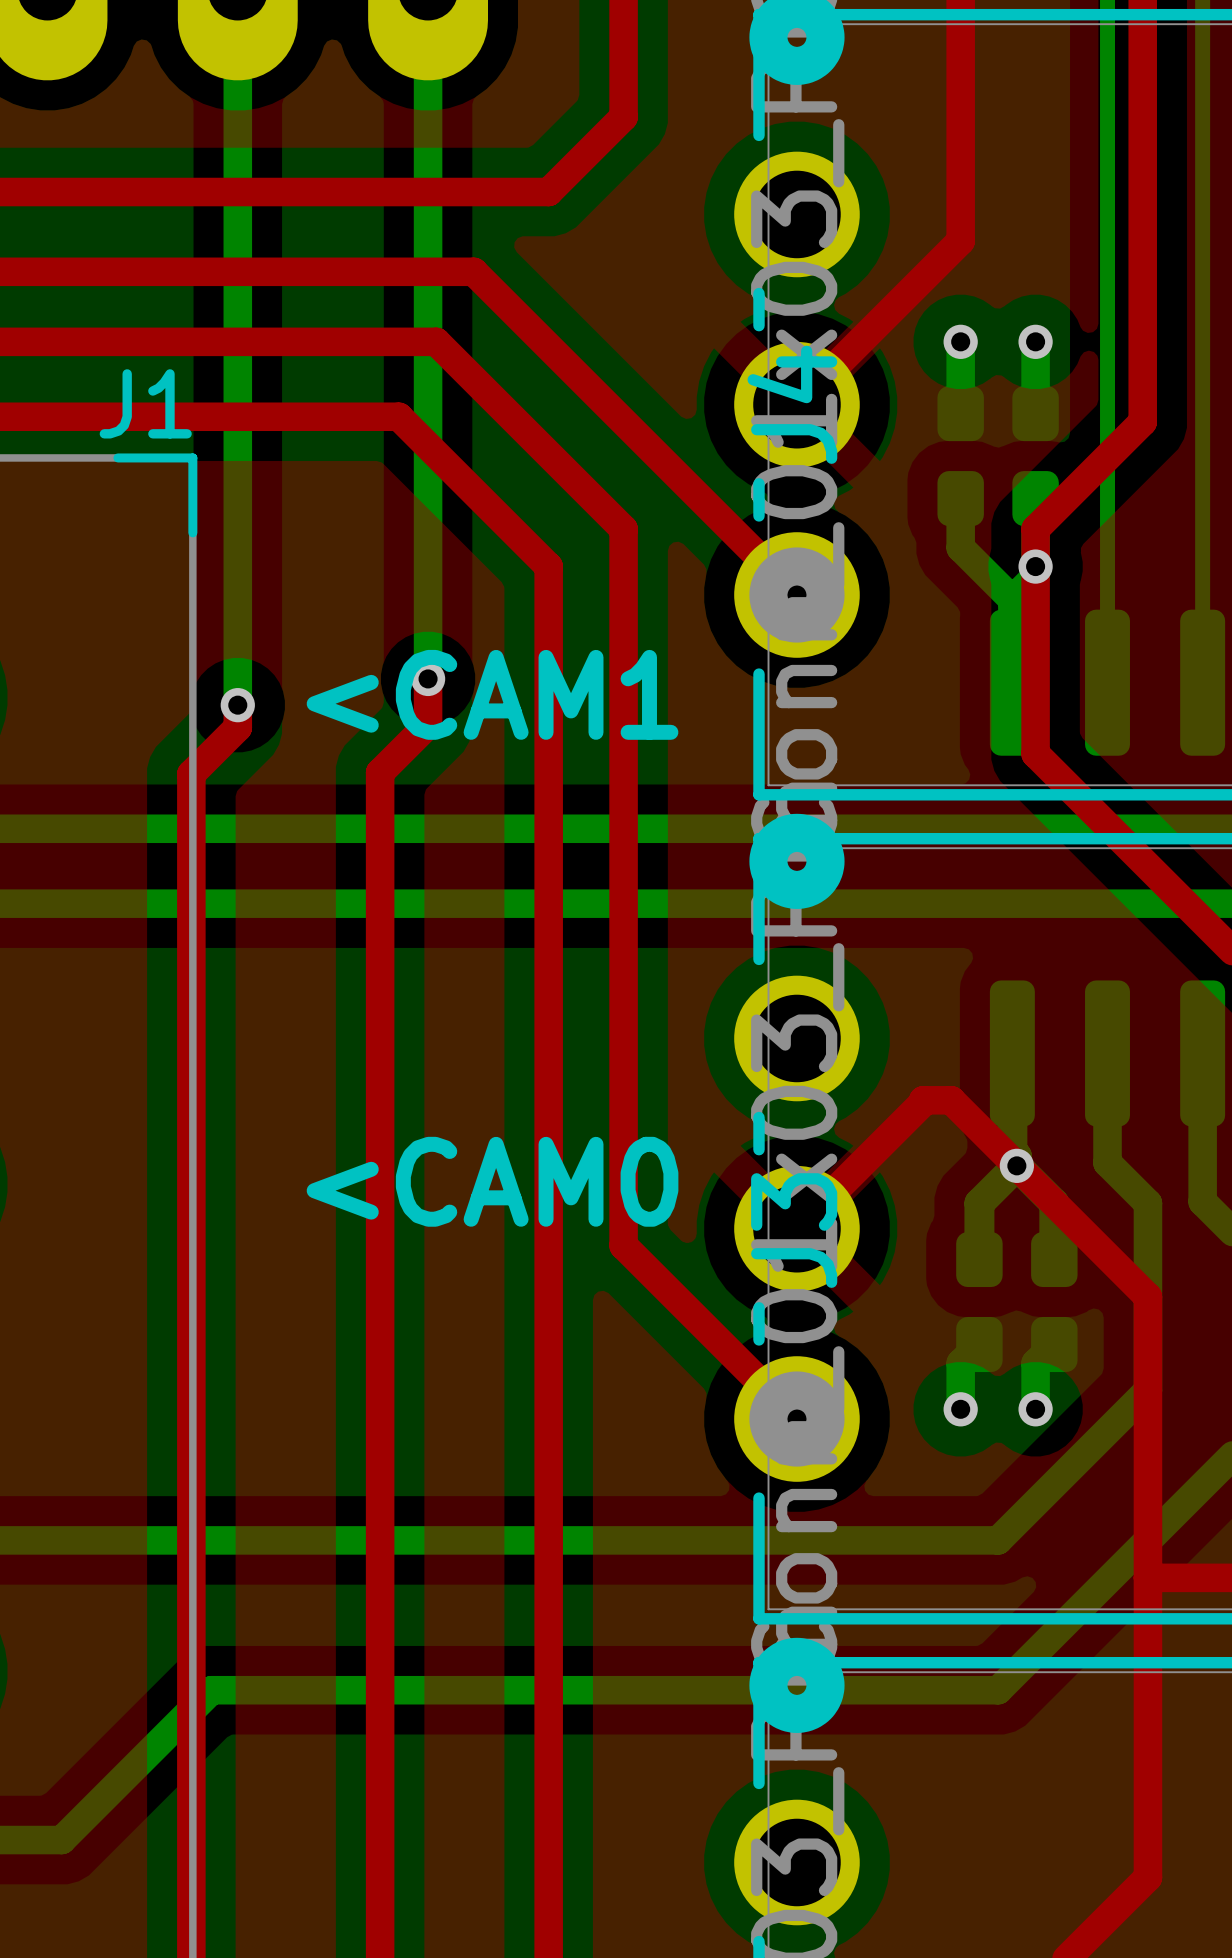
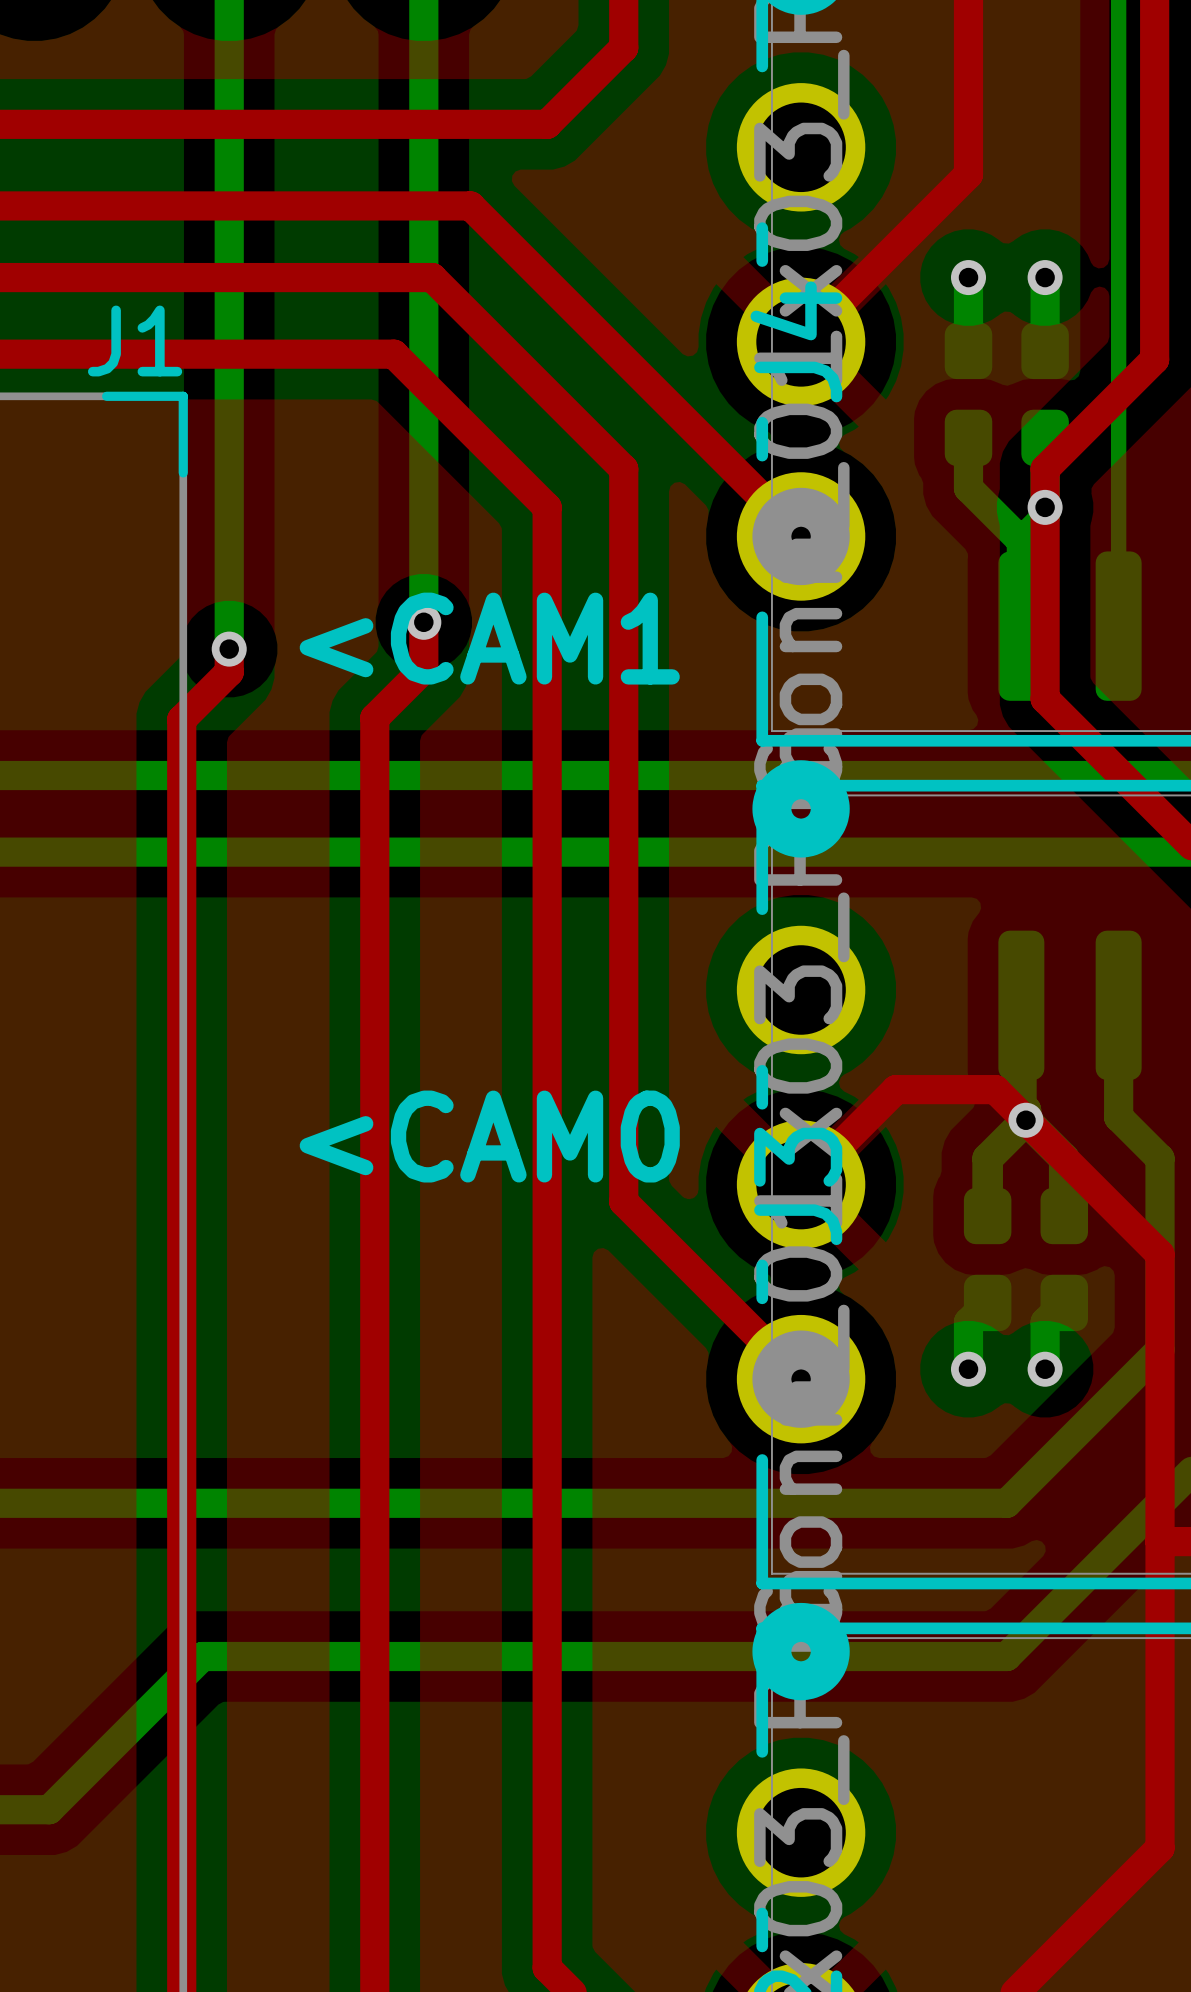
top track: (889, 1135) (923, 1100) (951, 1100) (986, 1135) -> (896, 1089) (995, 1089)

